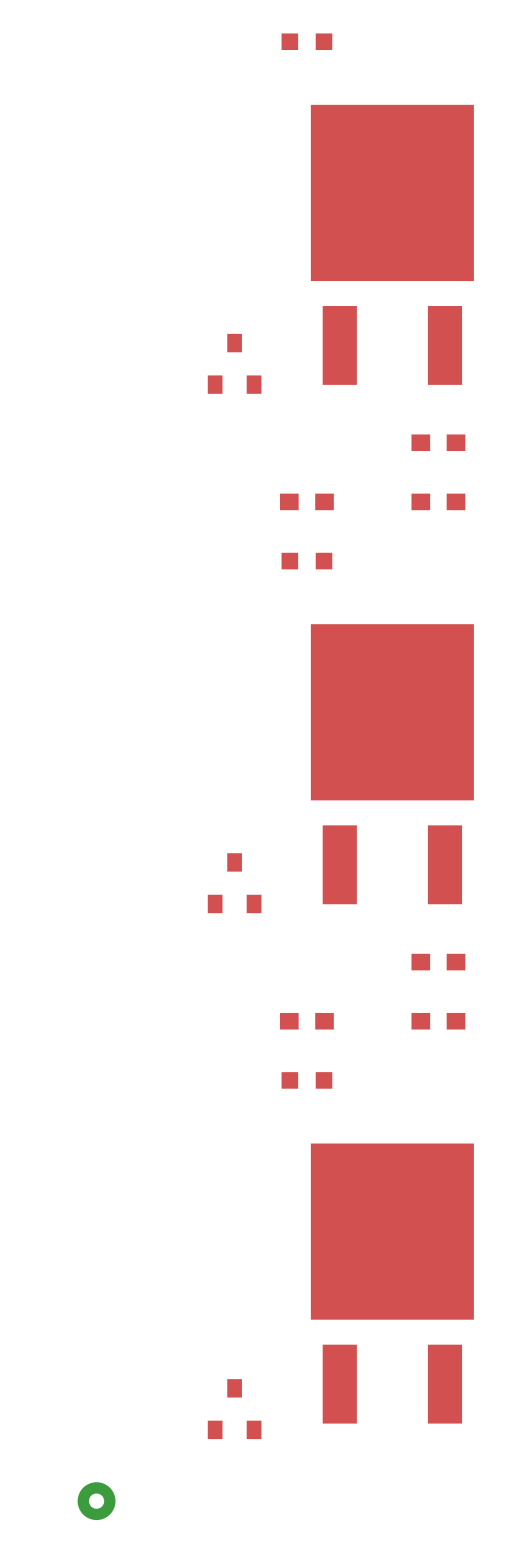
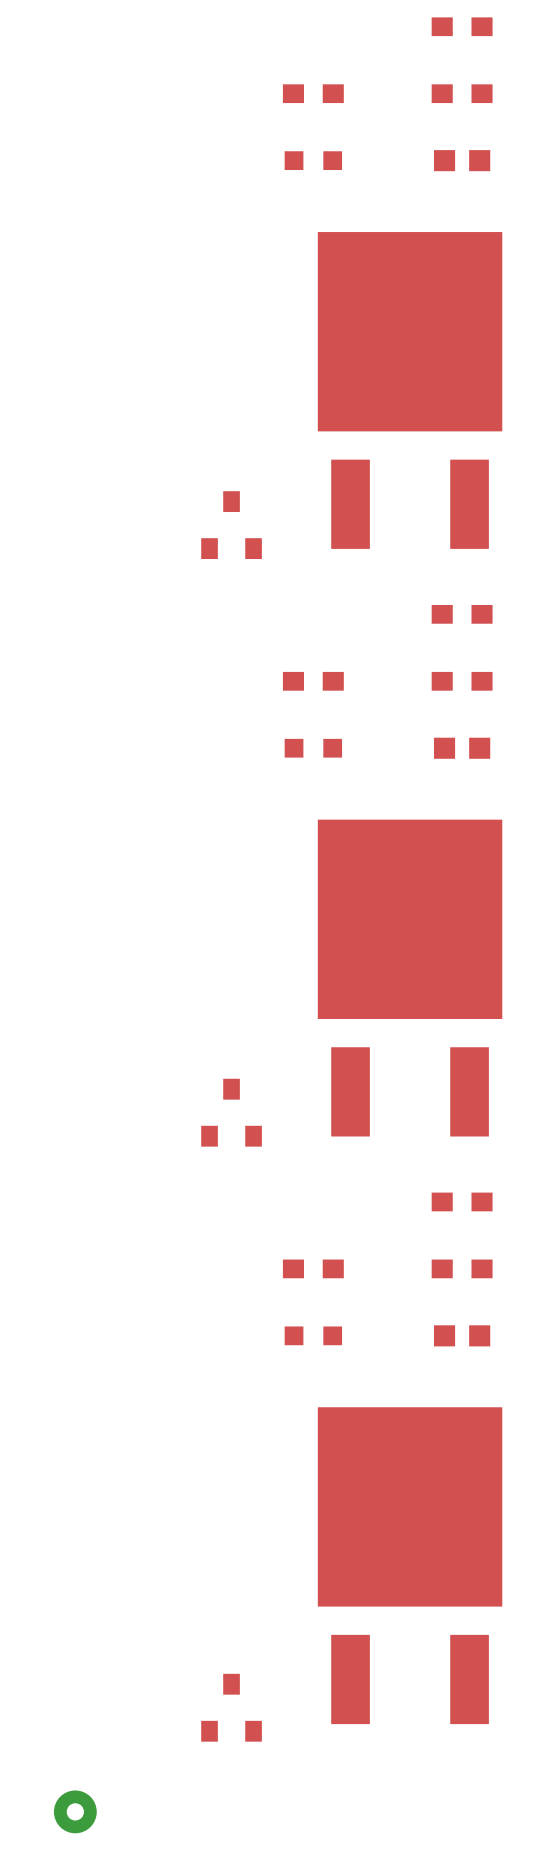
part: none -> (462, 160)
part: none -> (462, 748)
part: none -> (462, 1335)

